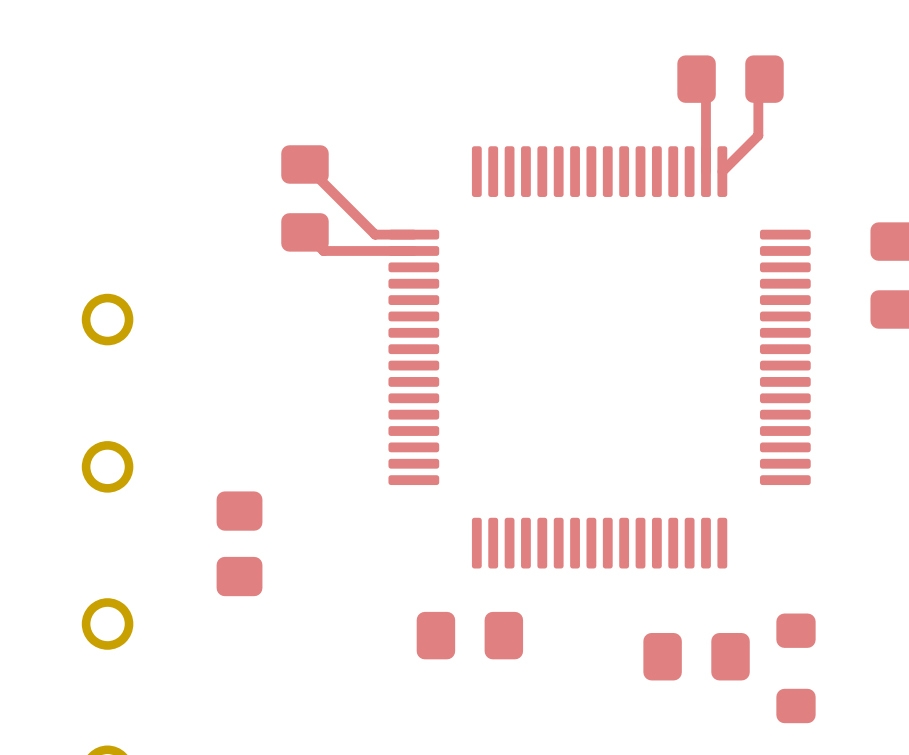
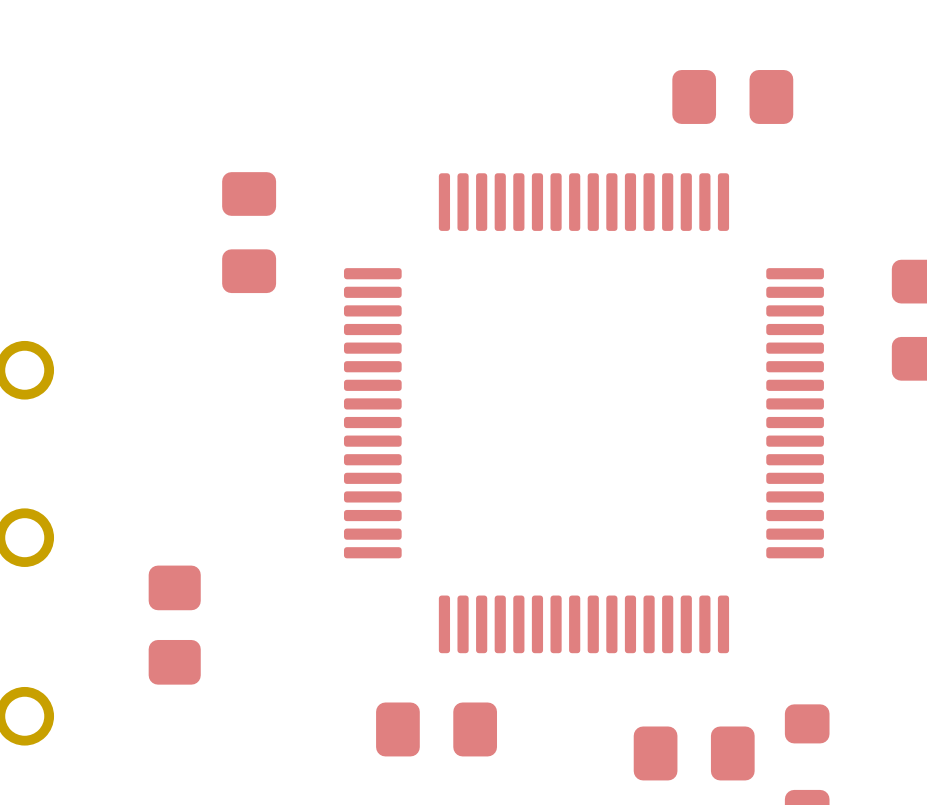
top track: (696, 79) (705, 88) (705, 171) -> none
top track: (764, 79) (758, 85) (758, 135) (722, 171) -> none
top track: (304, 164) (375, 234) (413, 234) -> none
top track: (304, 232) (323, 250) (413, 250) -> none

